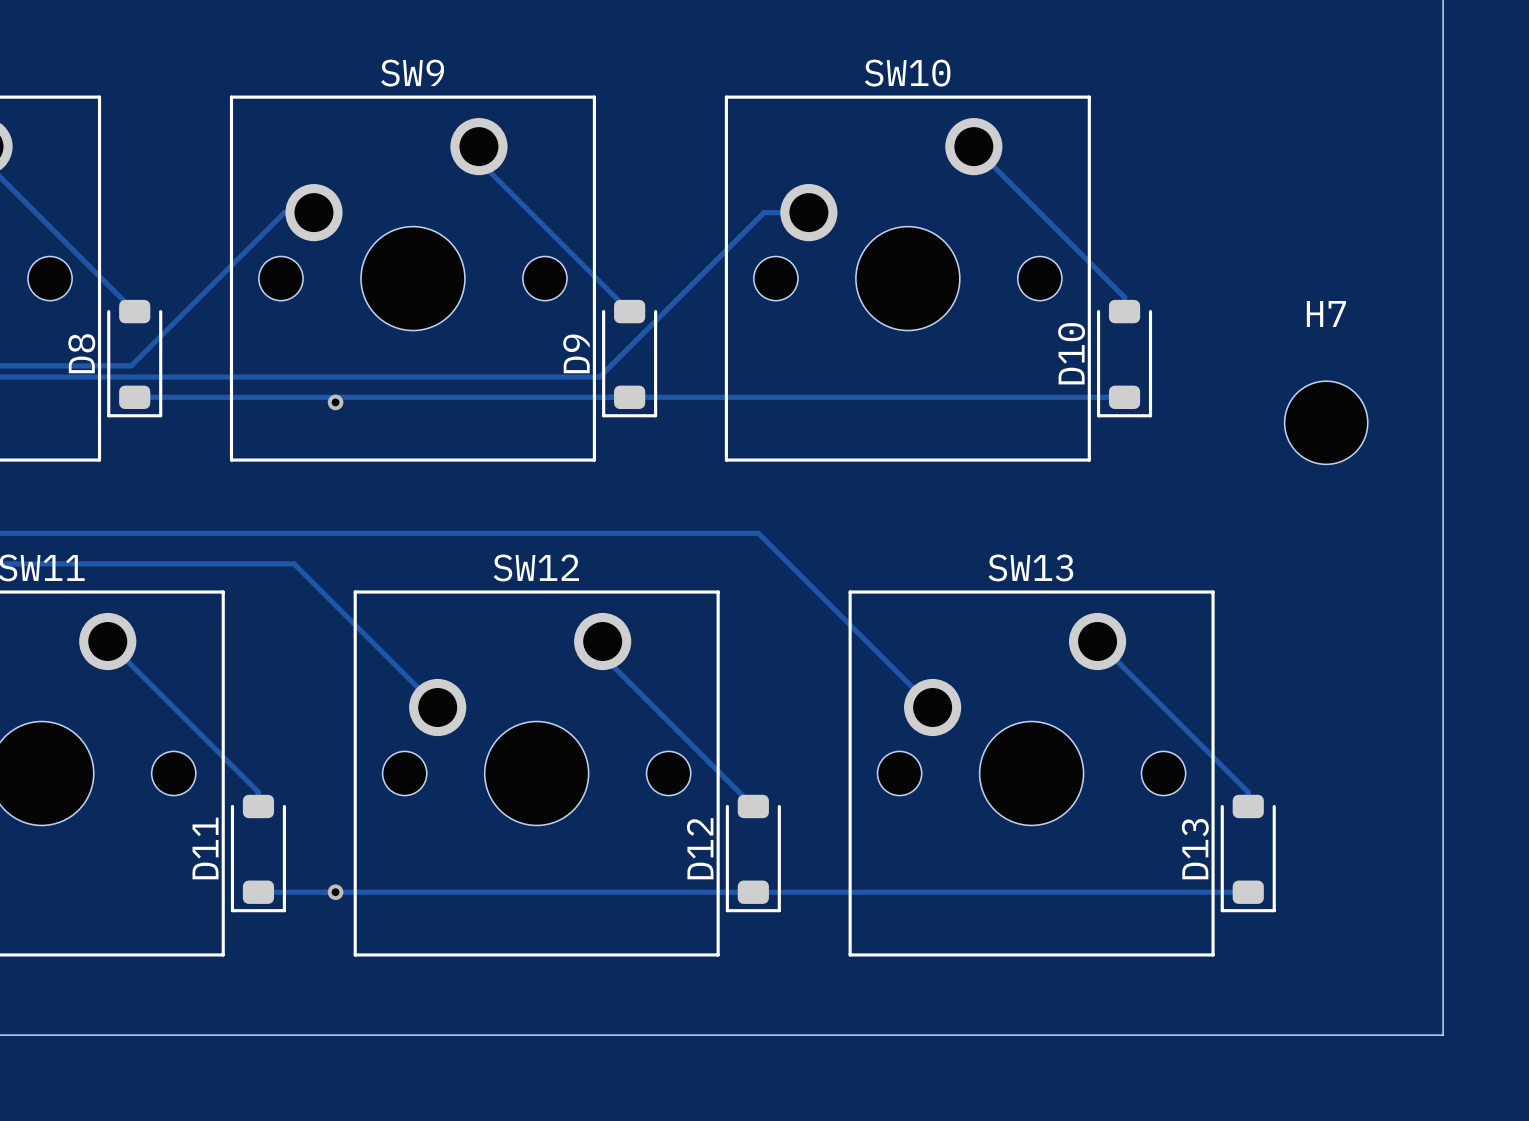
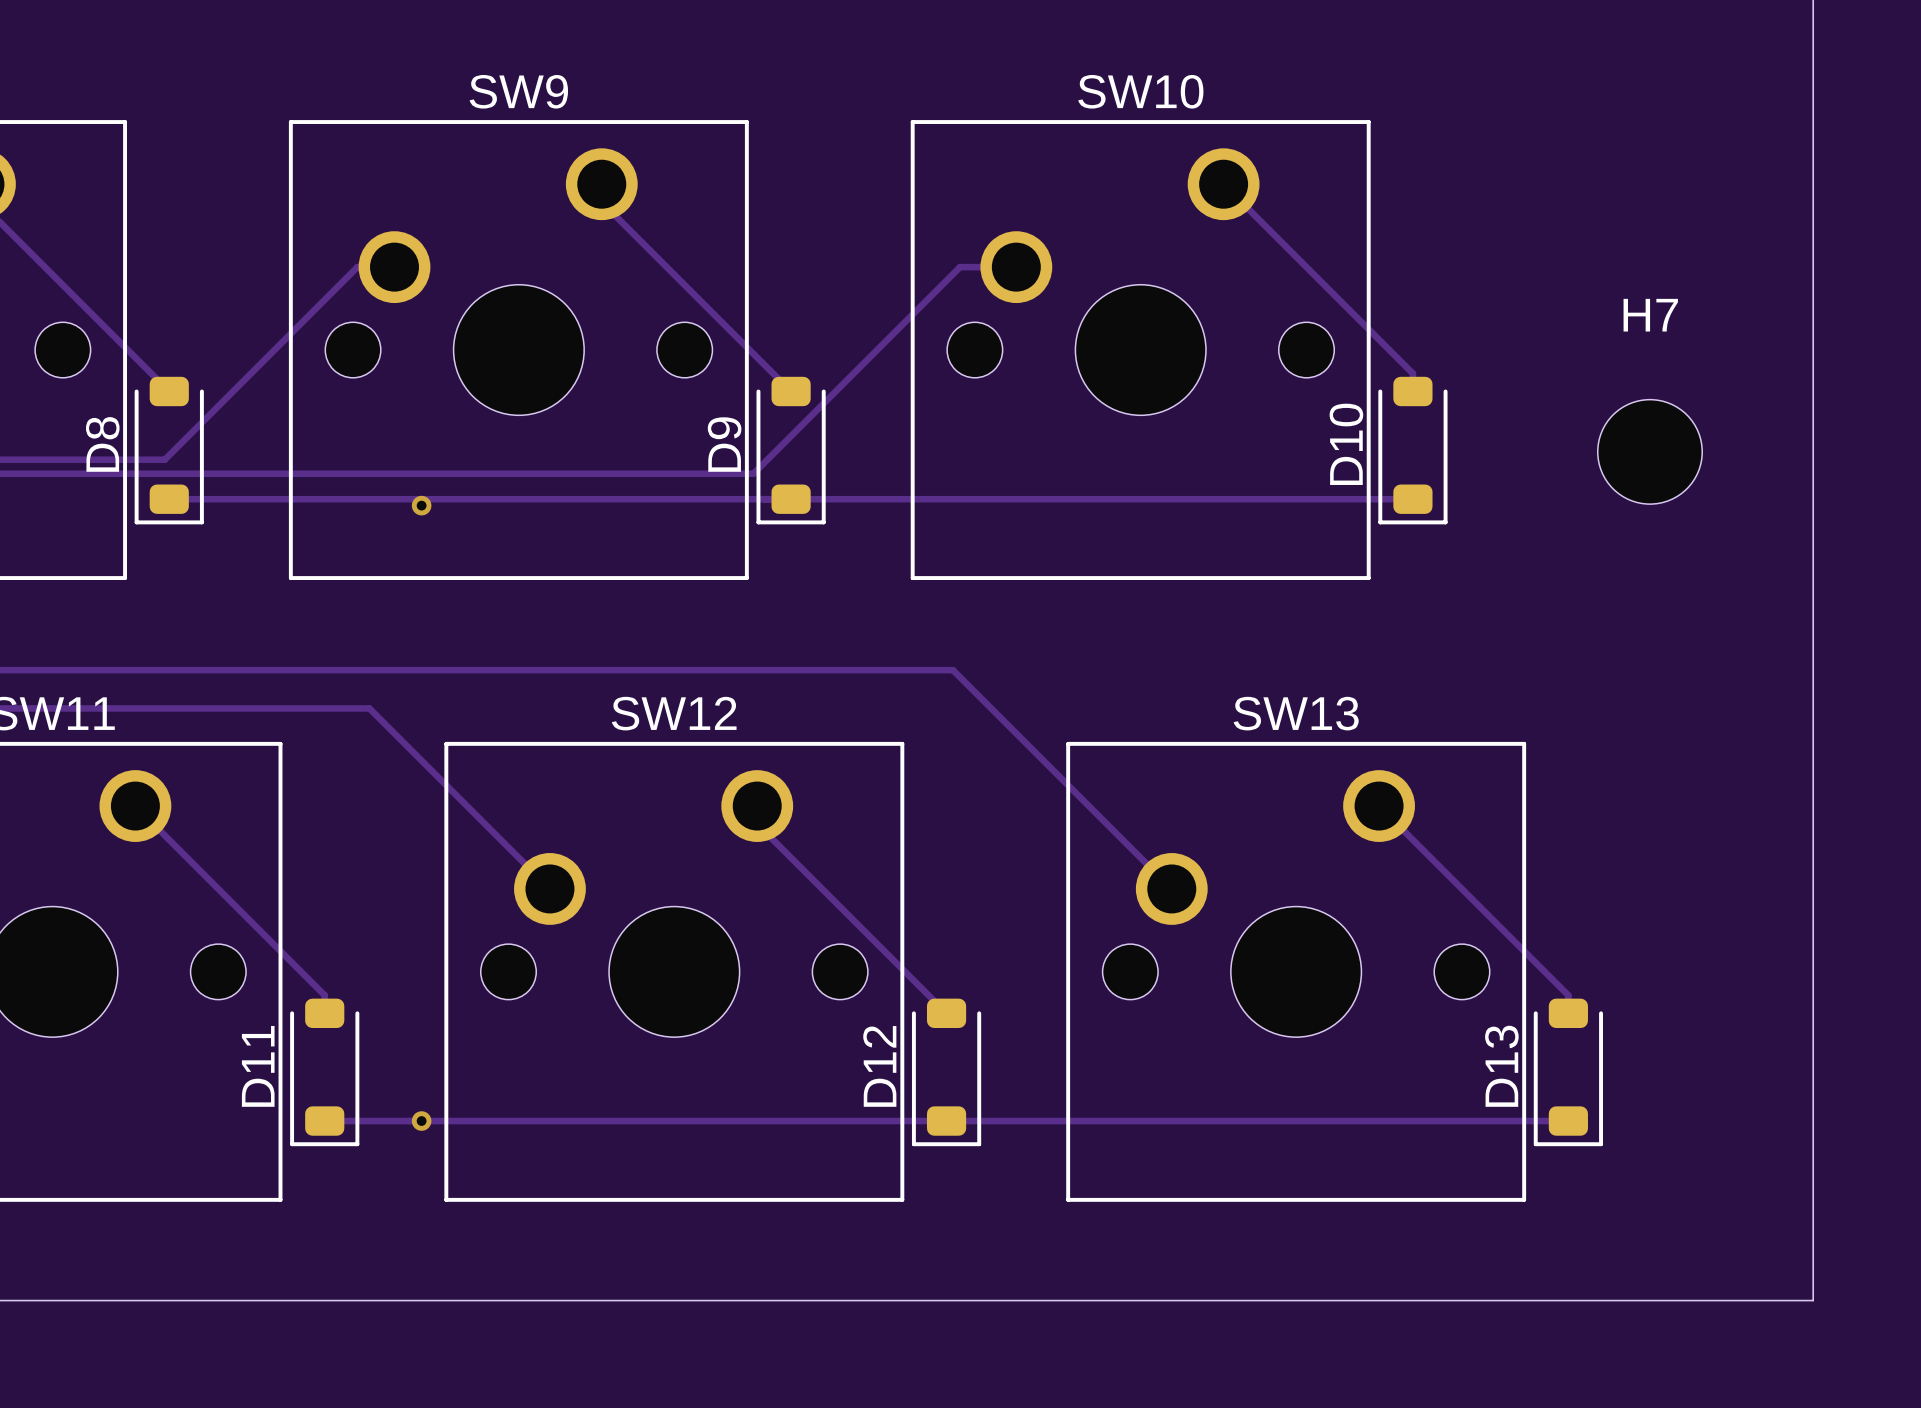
H7 position: (1326, 422) -> (1649, 451)

